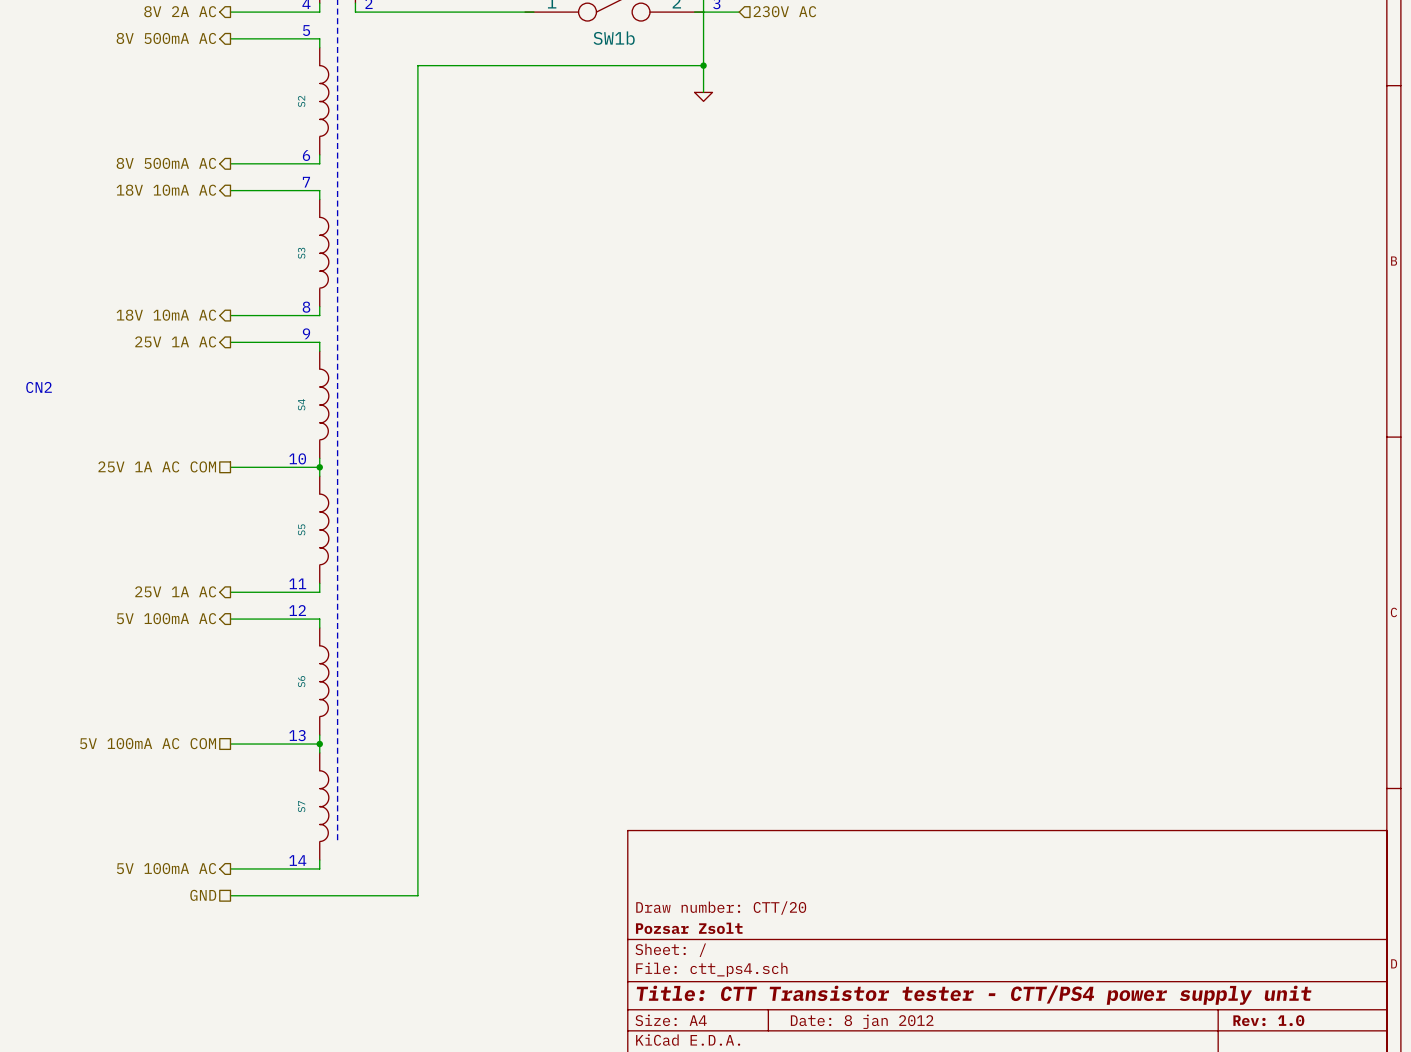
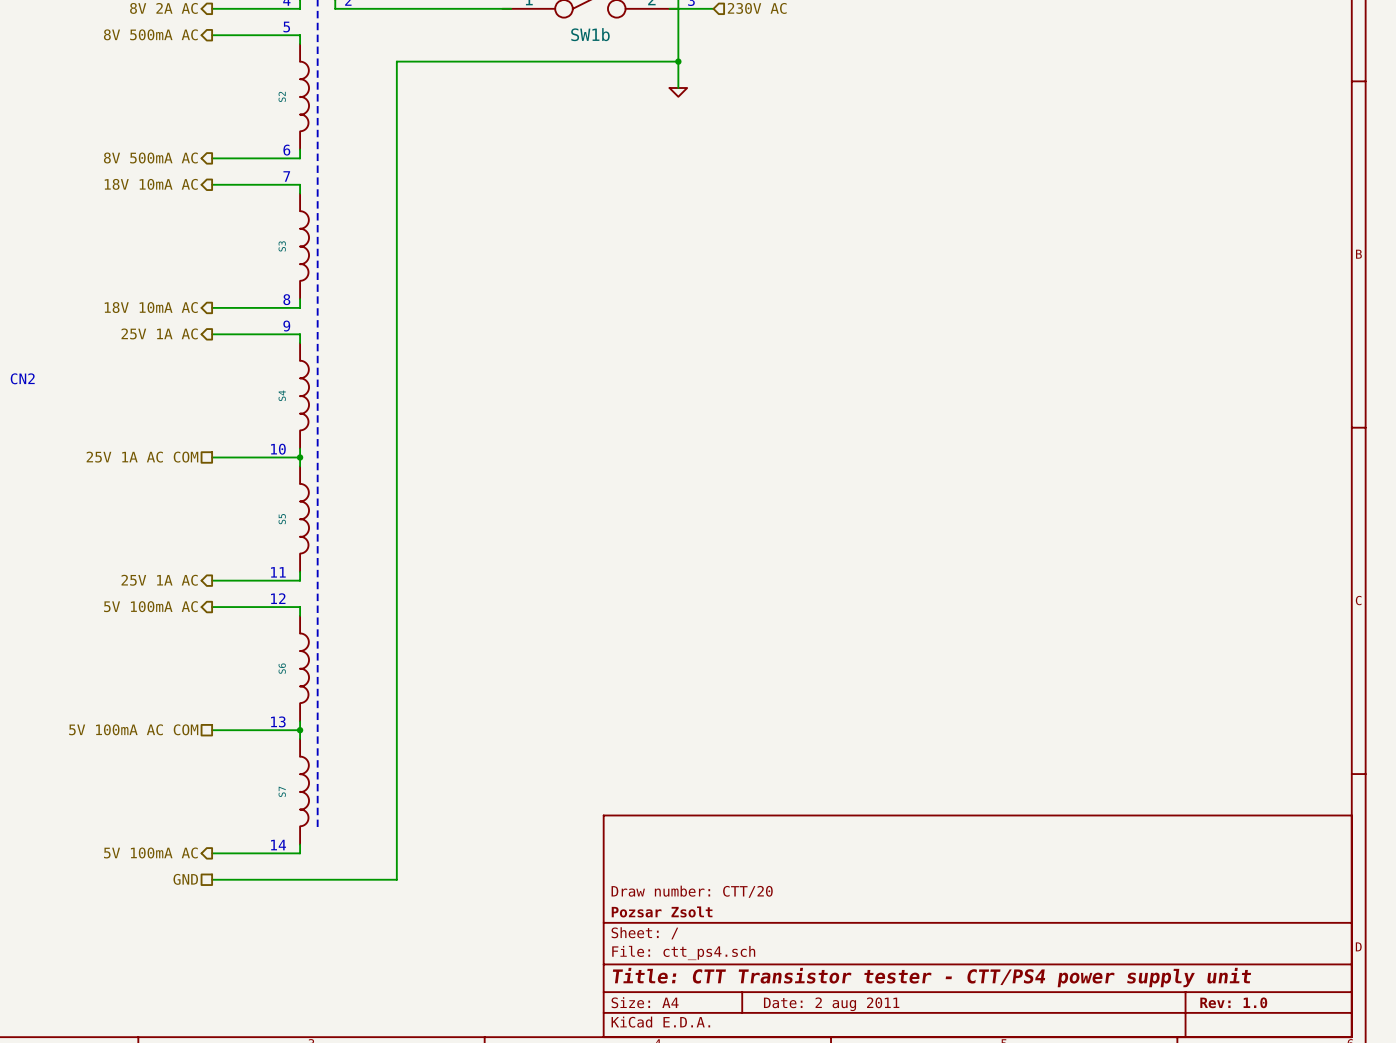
title block: Date: 8 jan 2012 (862, 1021) -> Date: 2 aug 2011 (831, 1004)

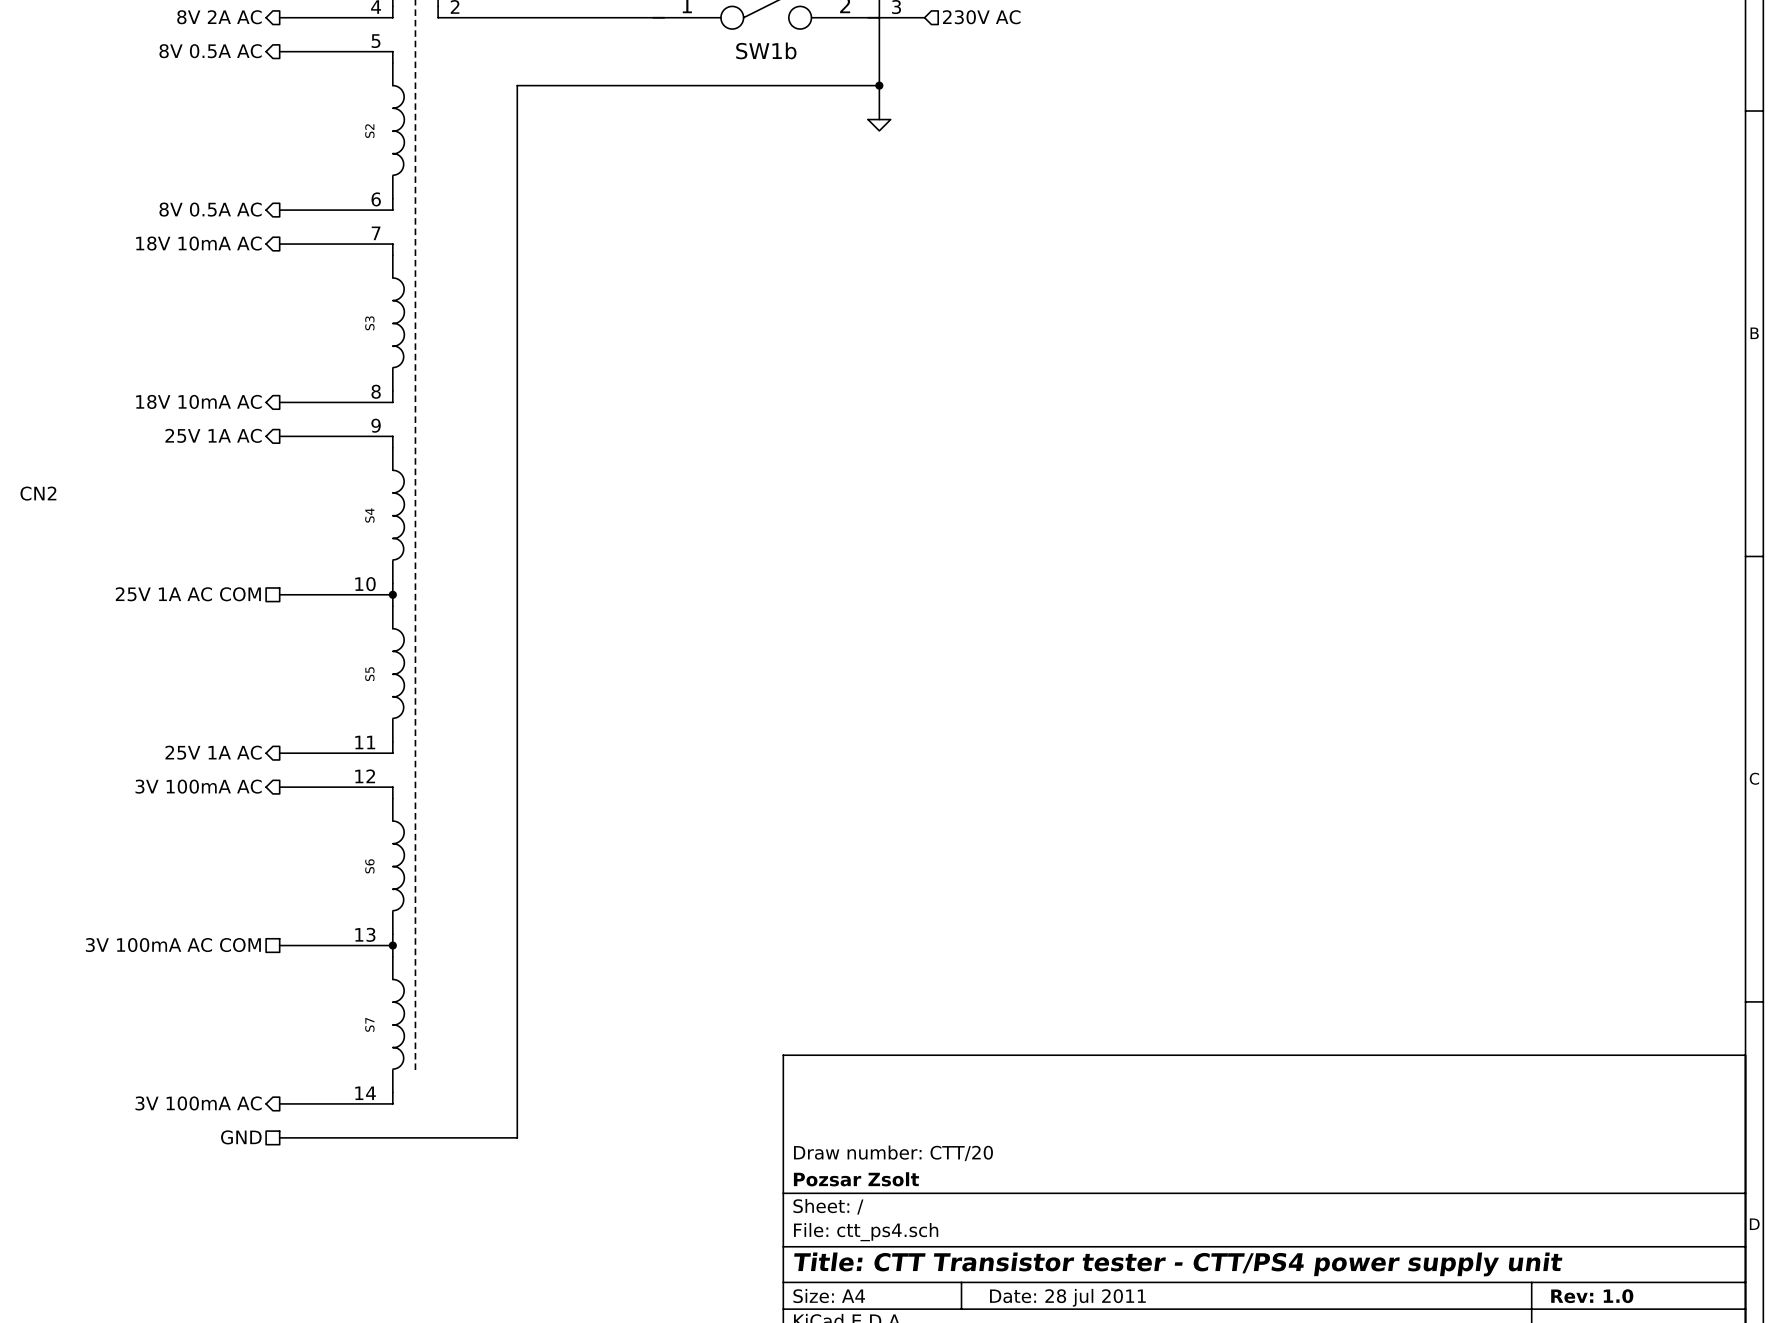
hierarchical label: 8V 500mA AC (150, 34) -> 8V 0.5A AC (210, 51)
hierarchical label: 8V 500mA AC (150, 157) -> 8V 0.5A AC (210, 209)
hierarchical label: 5V 100mA AC (150, 606) -> 3V 100mA AC (198, 786)
hierarchical label: 5V 100mA AC COM (133, 729) -> 3V 100mA AC COM (173, 945)
hierarchical label: 5V 100mA AC (150, 852) -> 3V 100mA AC (198, 1103)
title block: Date: 2 aug 2011 (831, 1004) -> Date: 28 jul 2011 (1067, 1297)

